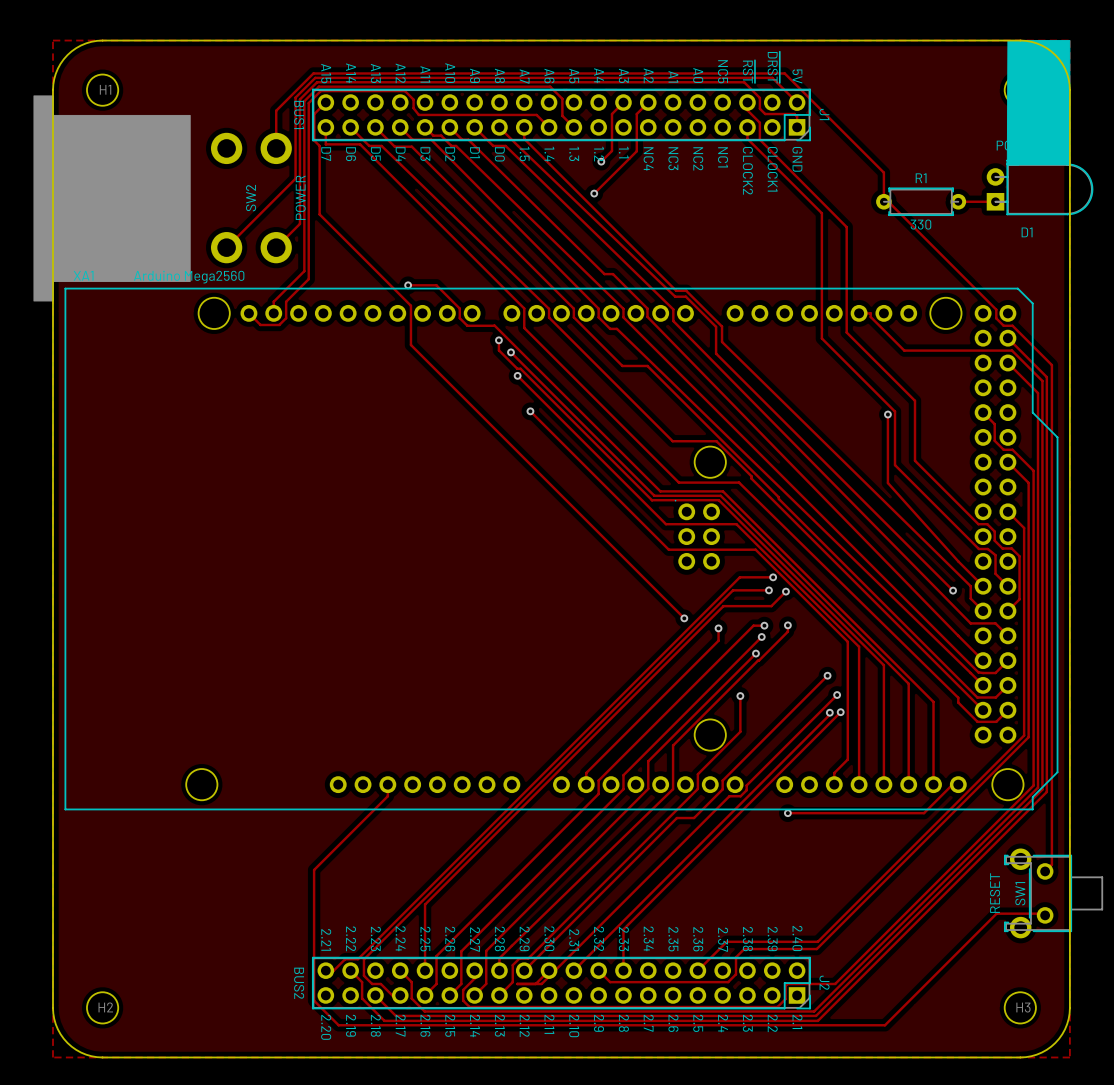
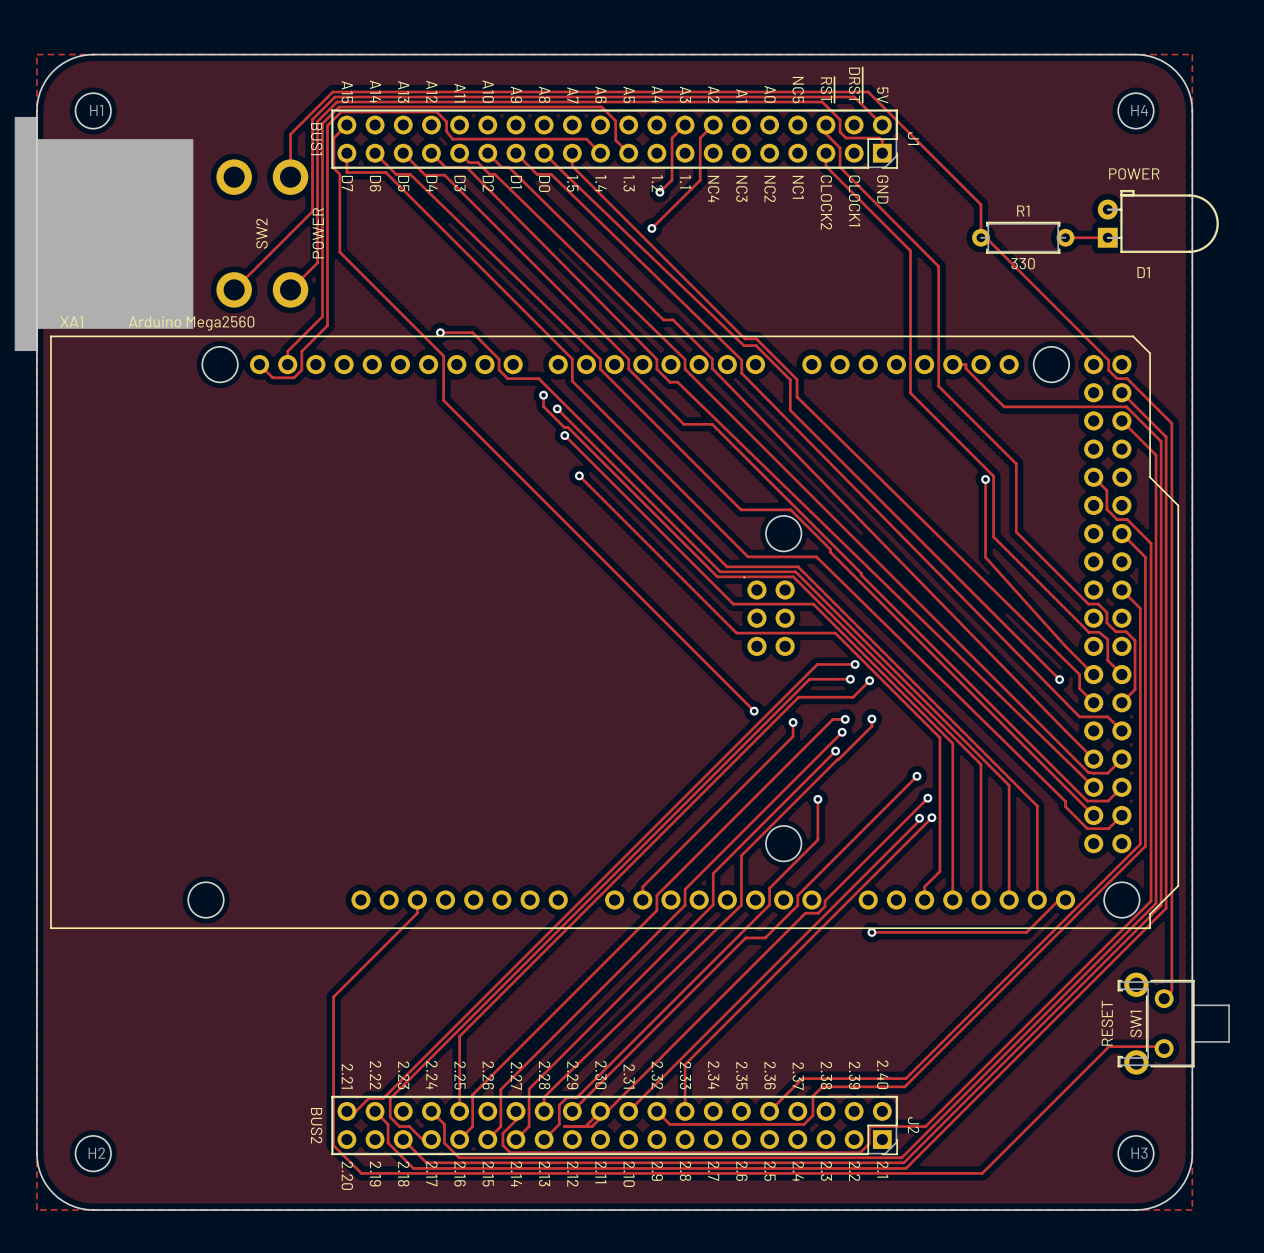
drawing: [1006, 40, 1071, 166] -> none

